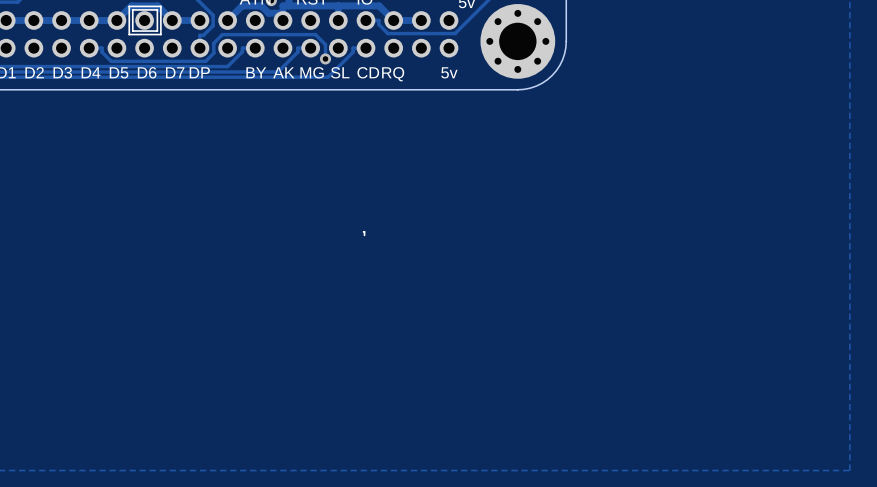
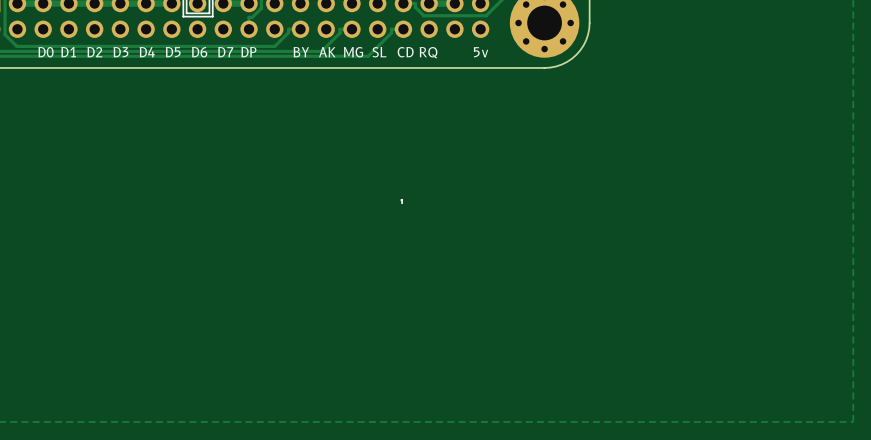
track: (89, 48) (102, 48) (102, 52) (111, 61) (205, 61) (213, 53) (213, 43) (222, 34) (315, 34) (325, 44) (325, 58) -> none
via: (325, 58) -> none

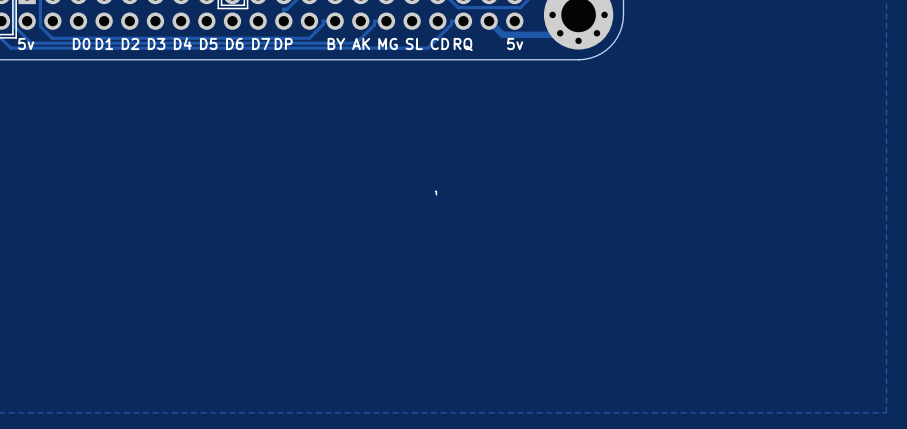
track: (403, 29) (391, 29) (391, 32) (368, 56) -> (463, 21) (451, 21) (451, 24) (427, 48) (402, 48)
track: none -> (489, 21) (502, 34) (552, 33)

